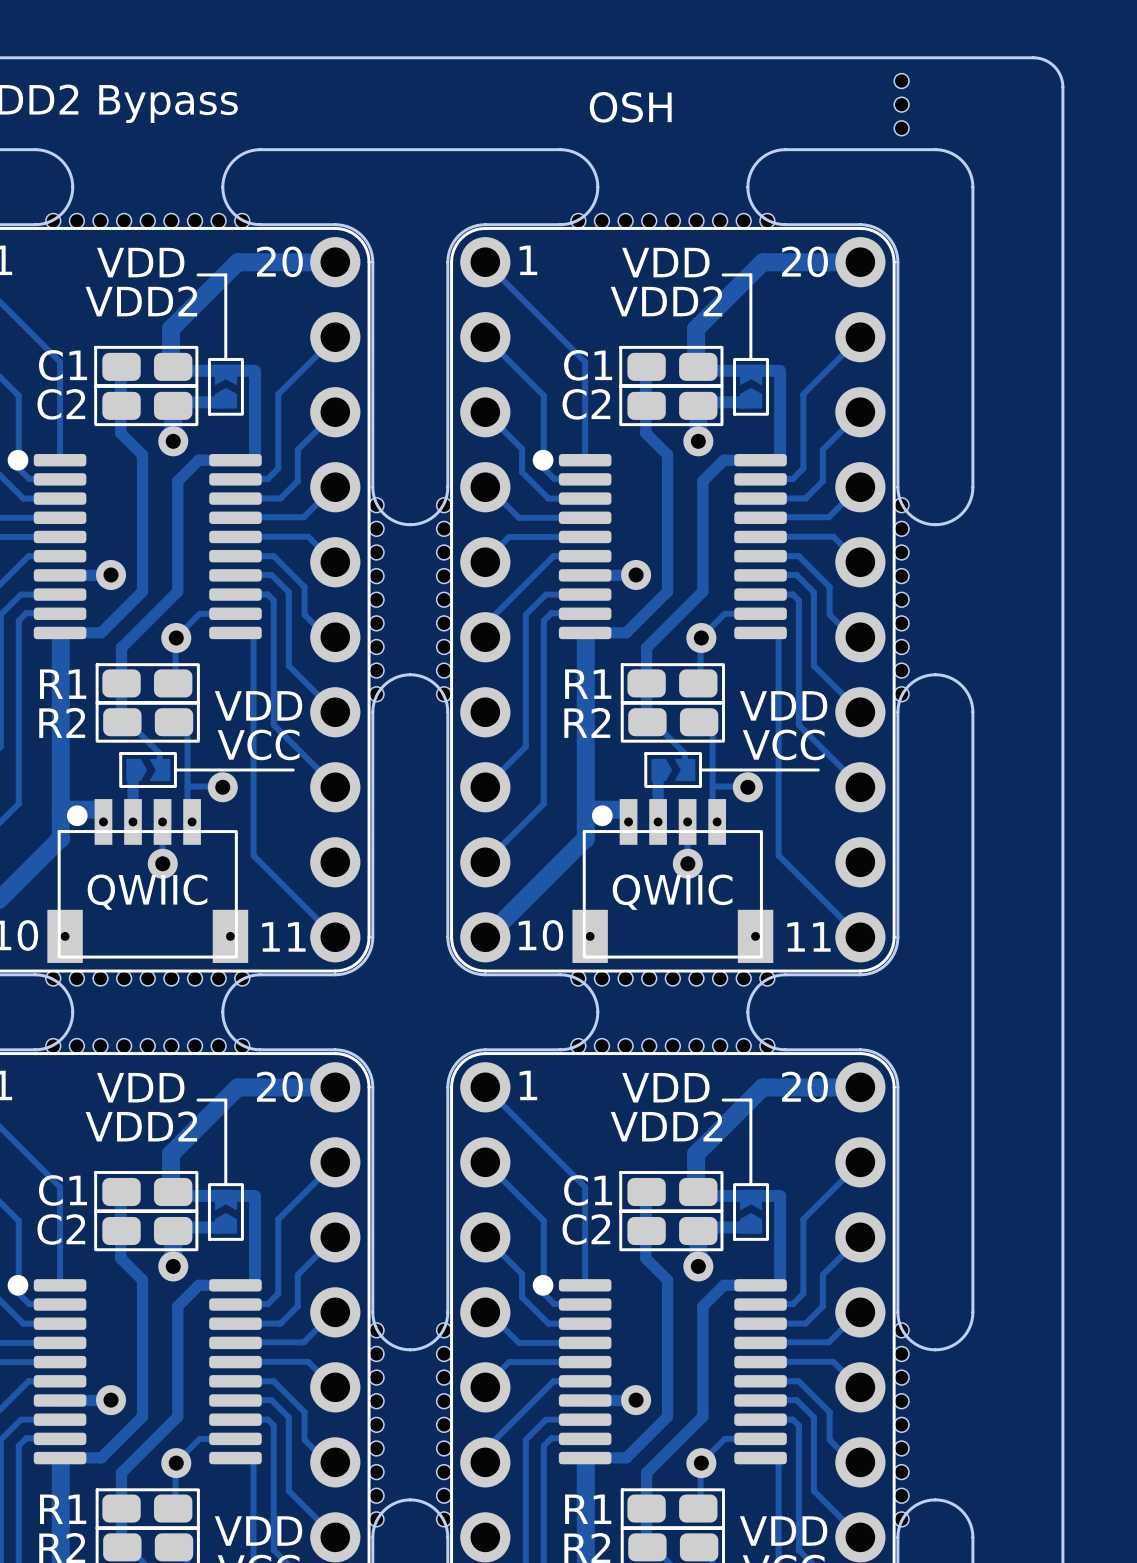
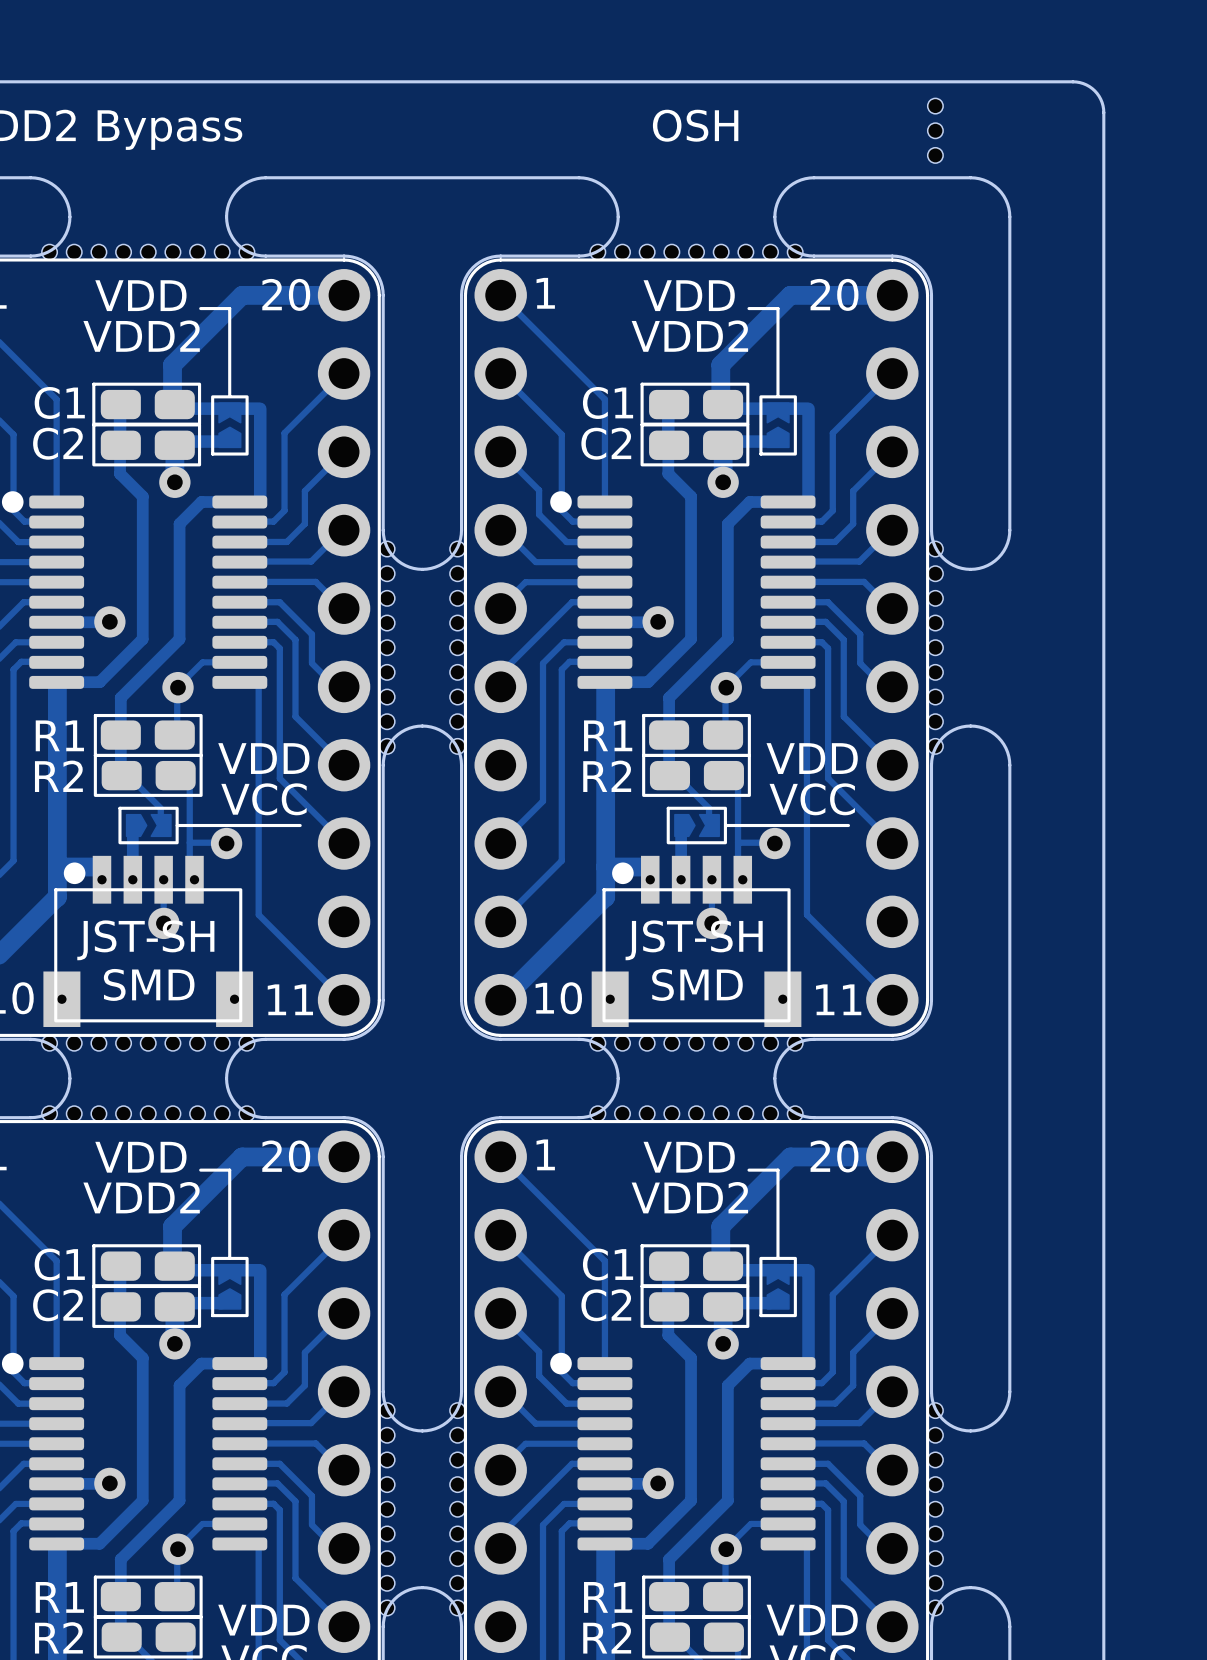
text position: OSH (630, 107) -> OSH (695, 125)
part text: none -> JST-SH (145, 940)
part text: none -> JST-SH (694, 940)
part text: QWIIC (147, 892) -> none
part text: QWIIC (672, 892) -> none
part text: none -> SMD (149, 984)
part text: none -> SMD (697, 984)

